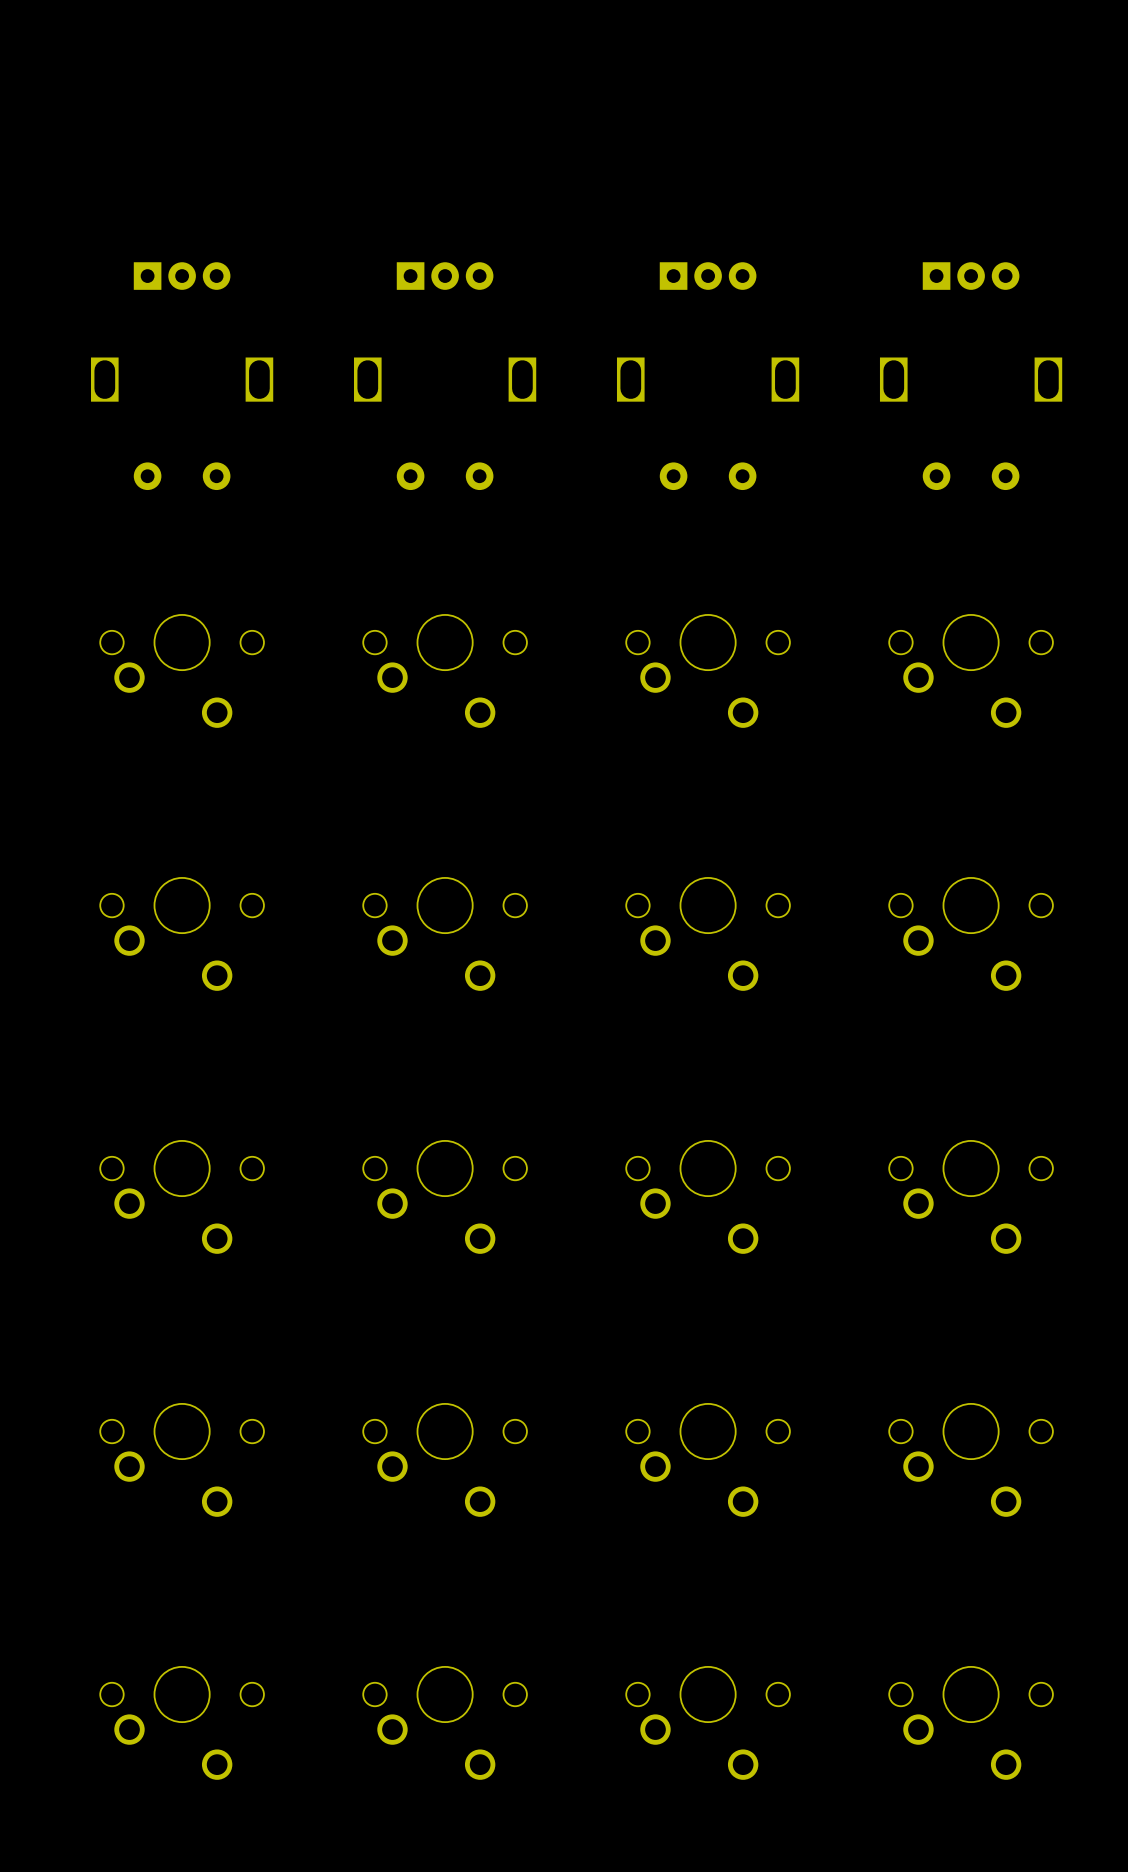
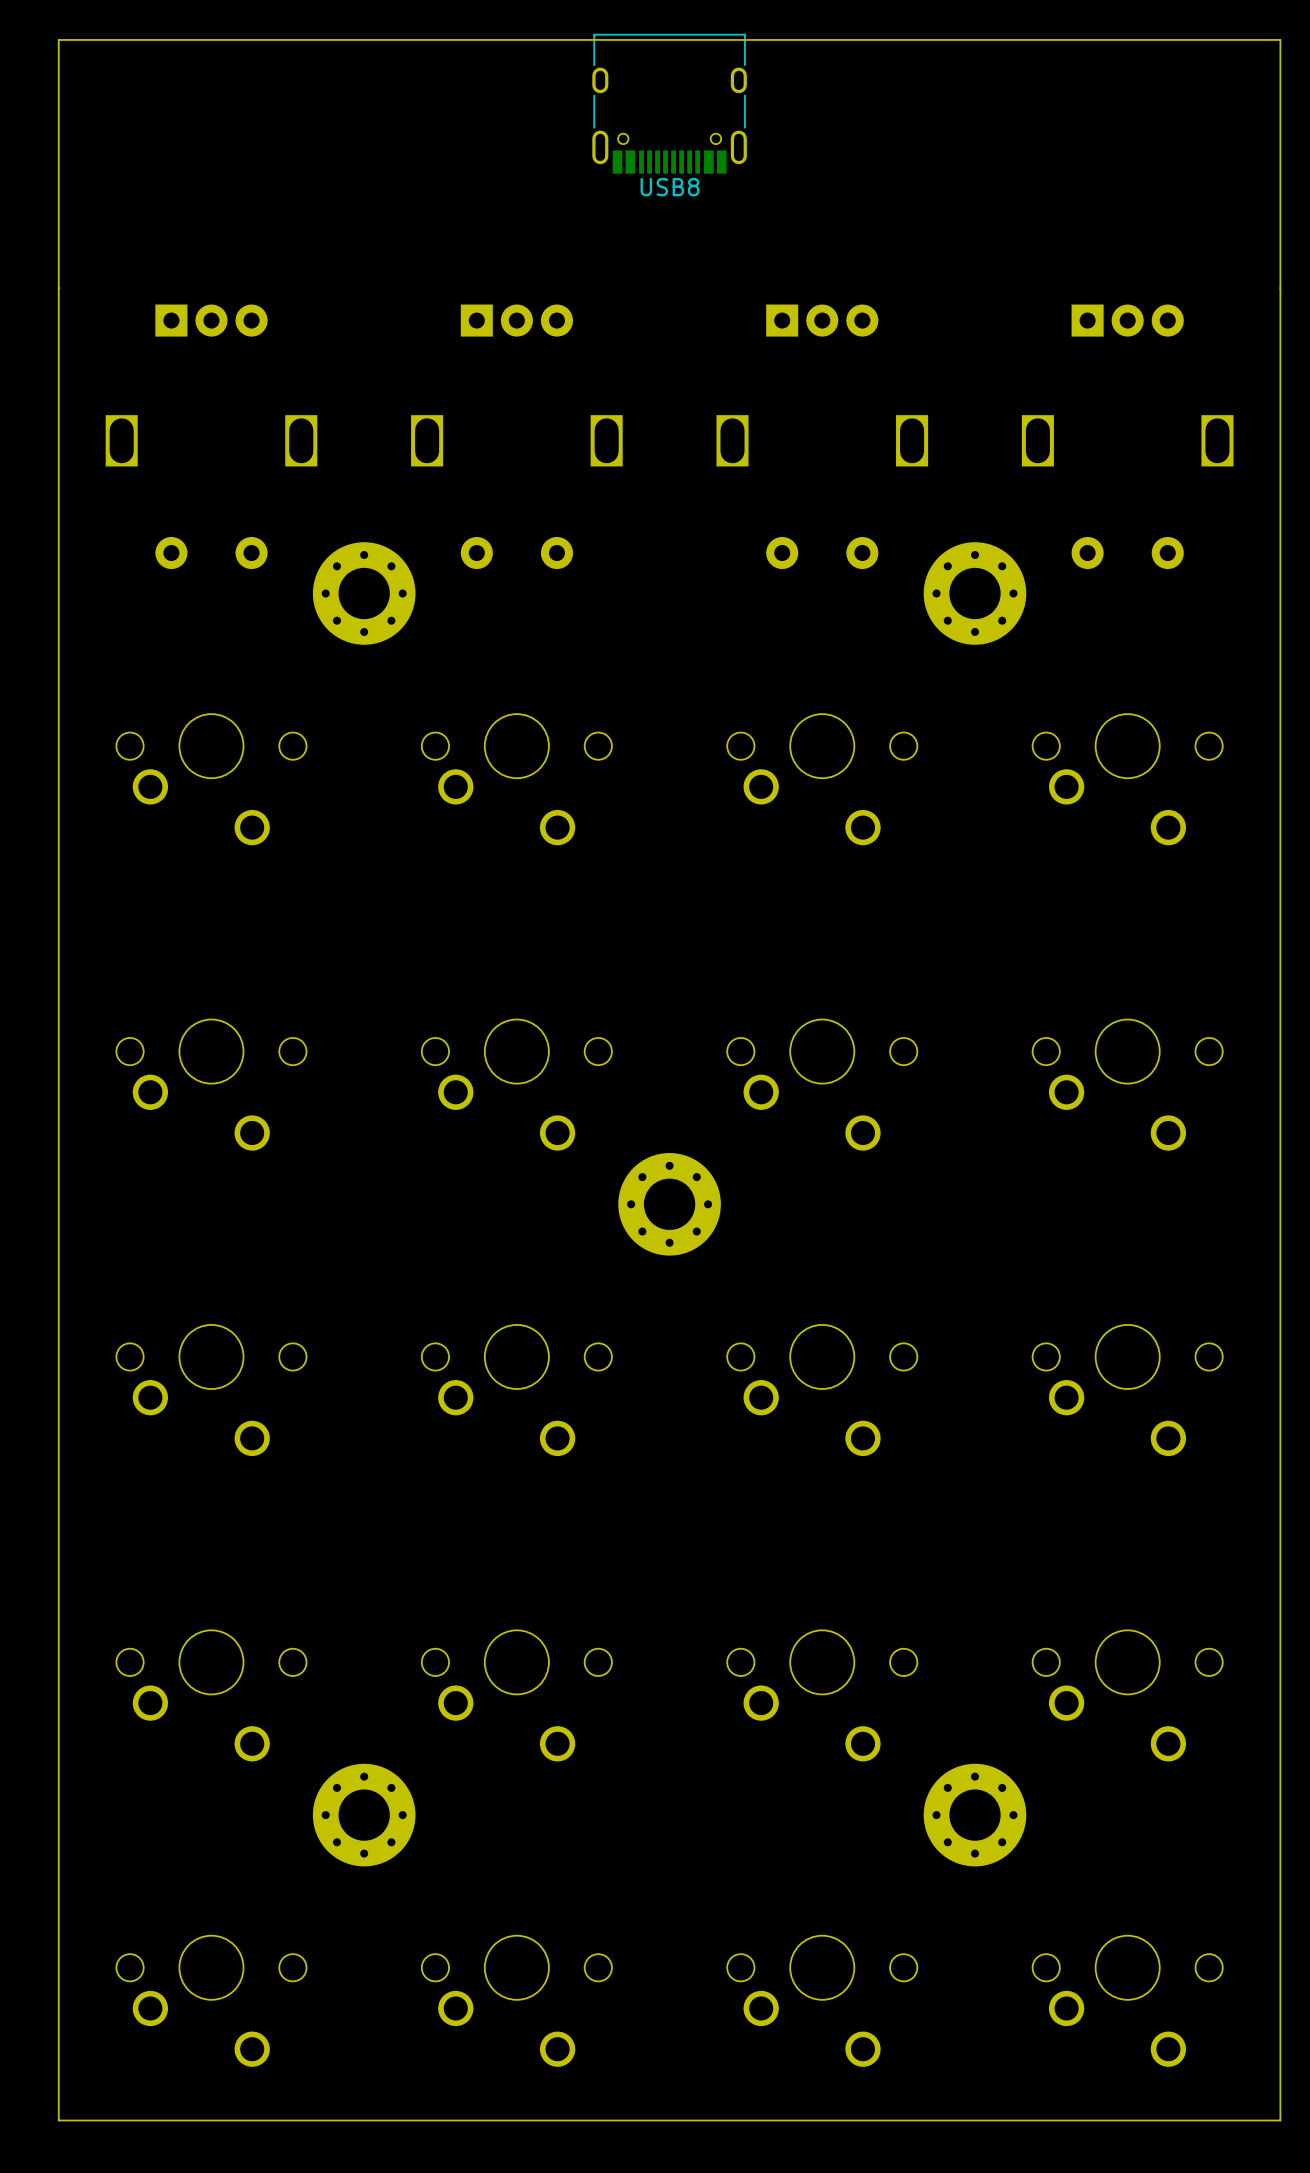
board edge: none -> (1280, 39) (58, 39) (58, 2120) (1280, 2120) (1280, 39)
USB8: none -> (669, 103)
part: none -> (364, 593)
part: none -> (974, 593)
part: none -> (669, 1204)
part: none -> (364, 1815)
part: none -> (974, 1815)

